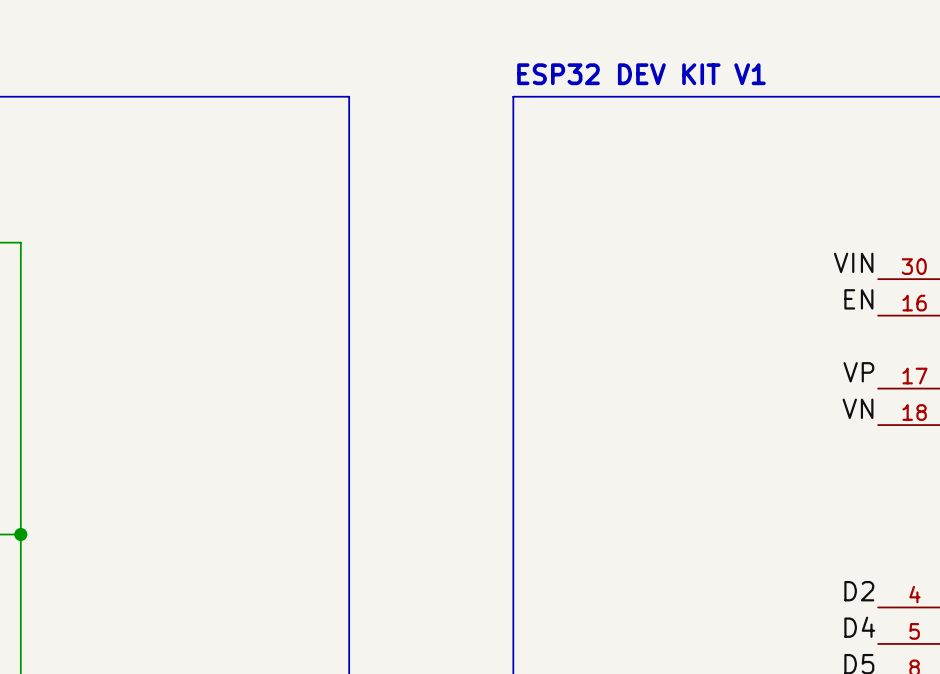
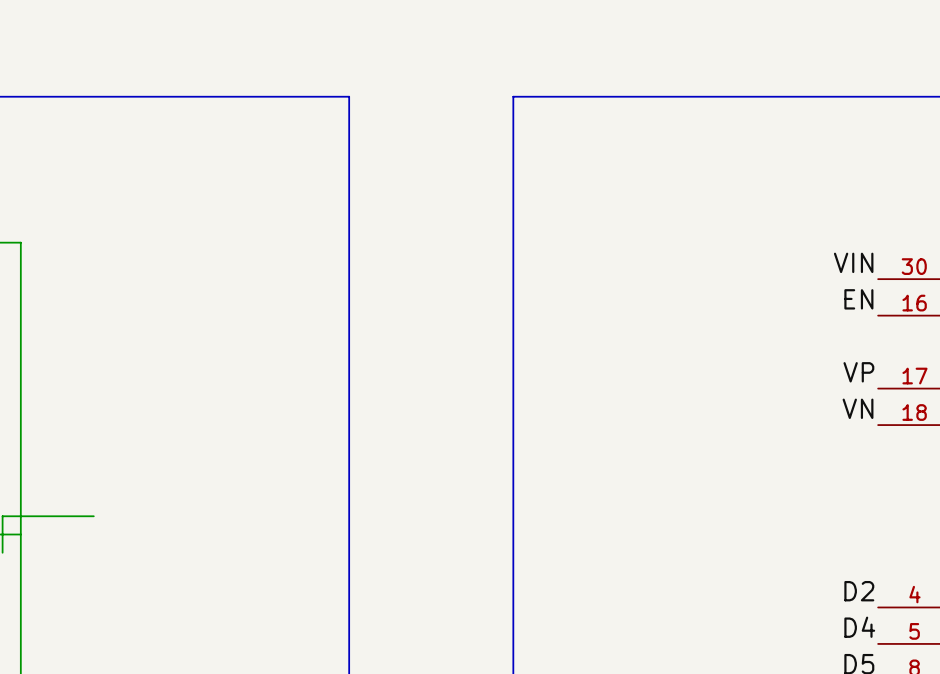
text: ESP32 DEV KIT V1 (641, 74) -> none
wire: none -> (93, 516) (2, 516) (2, 552)
junction: (20, 534) -> none

